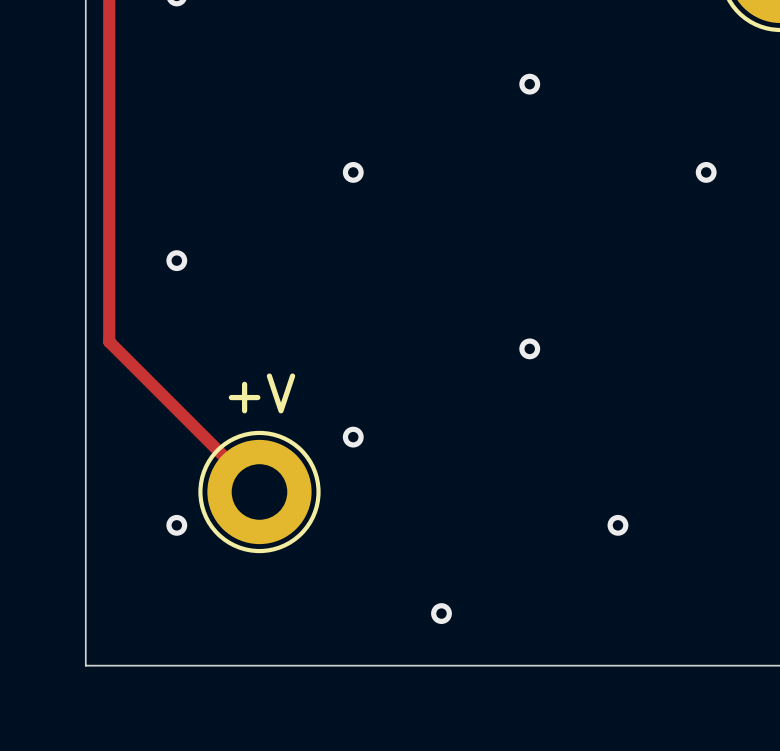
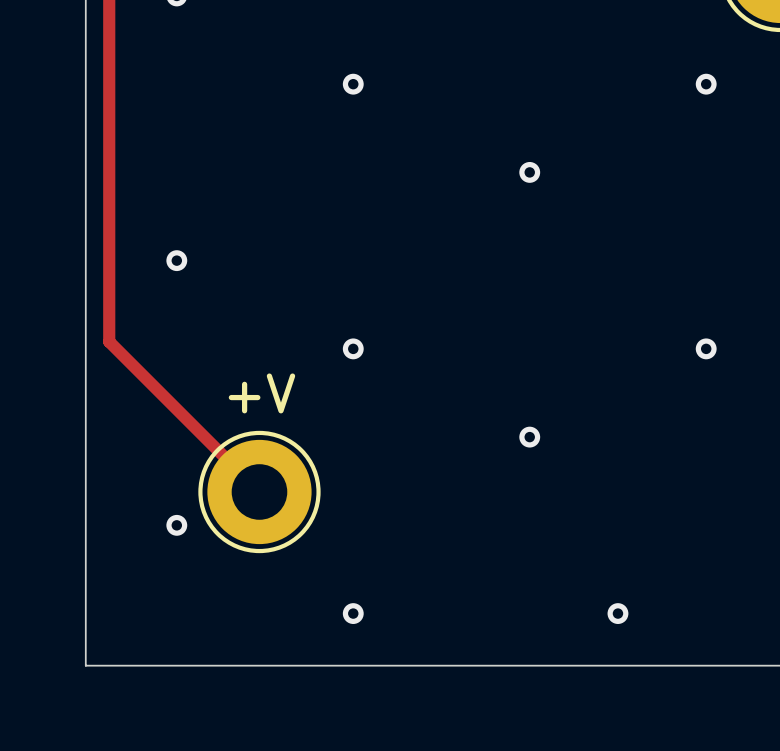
via: none -> (353, 84)
via: (529, 84) -> none
via: none -> (706, 84)
via: (353, 172) -> none
via: none -> (529, 172)
via: (706, 172) -> none
via: none -> (353, 348)
via: (529, 348) -> none
via: none -> (706, 348)
via: (353, 437) -> none
via: none -> (529, 437)
via: (617, 525) -> none
via: none -> (353, 613)
via: (441, 613) -> none
via: none -> (617, 613)

